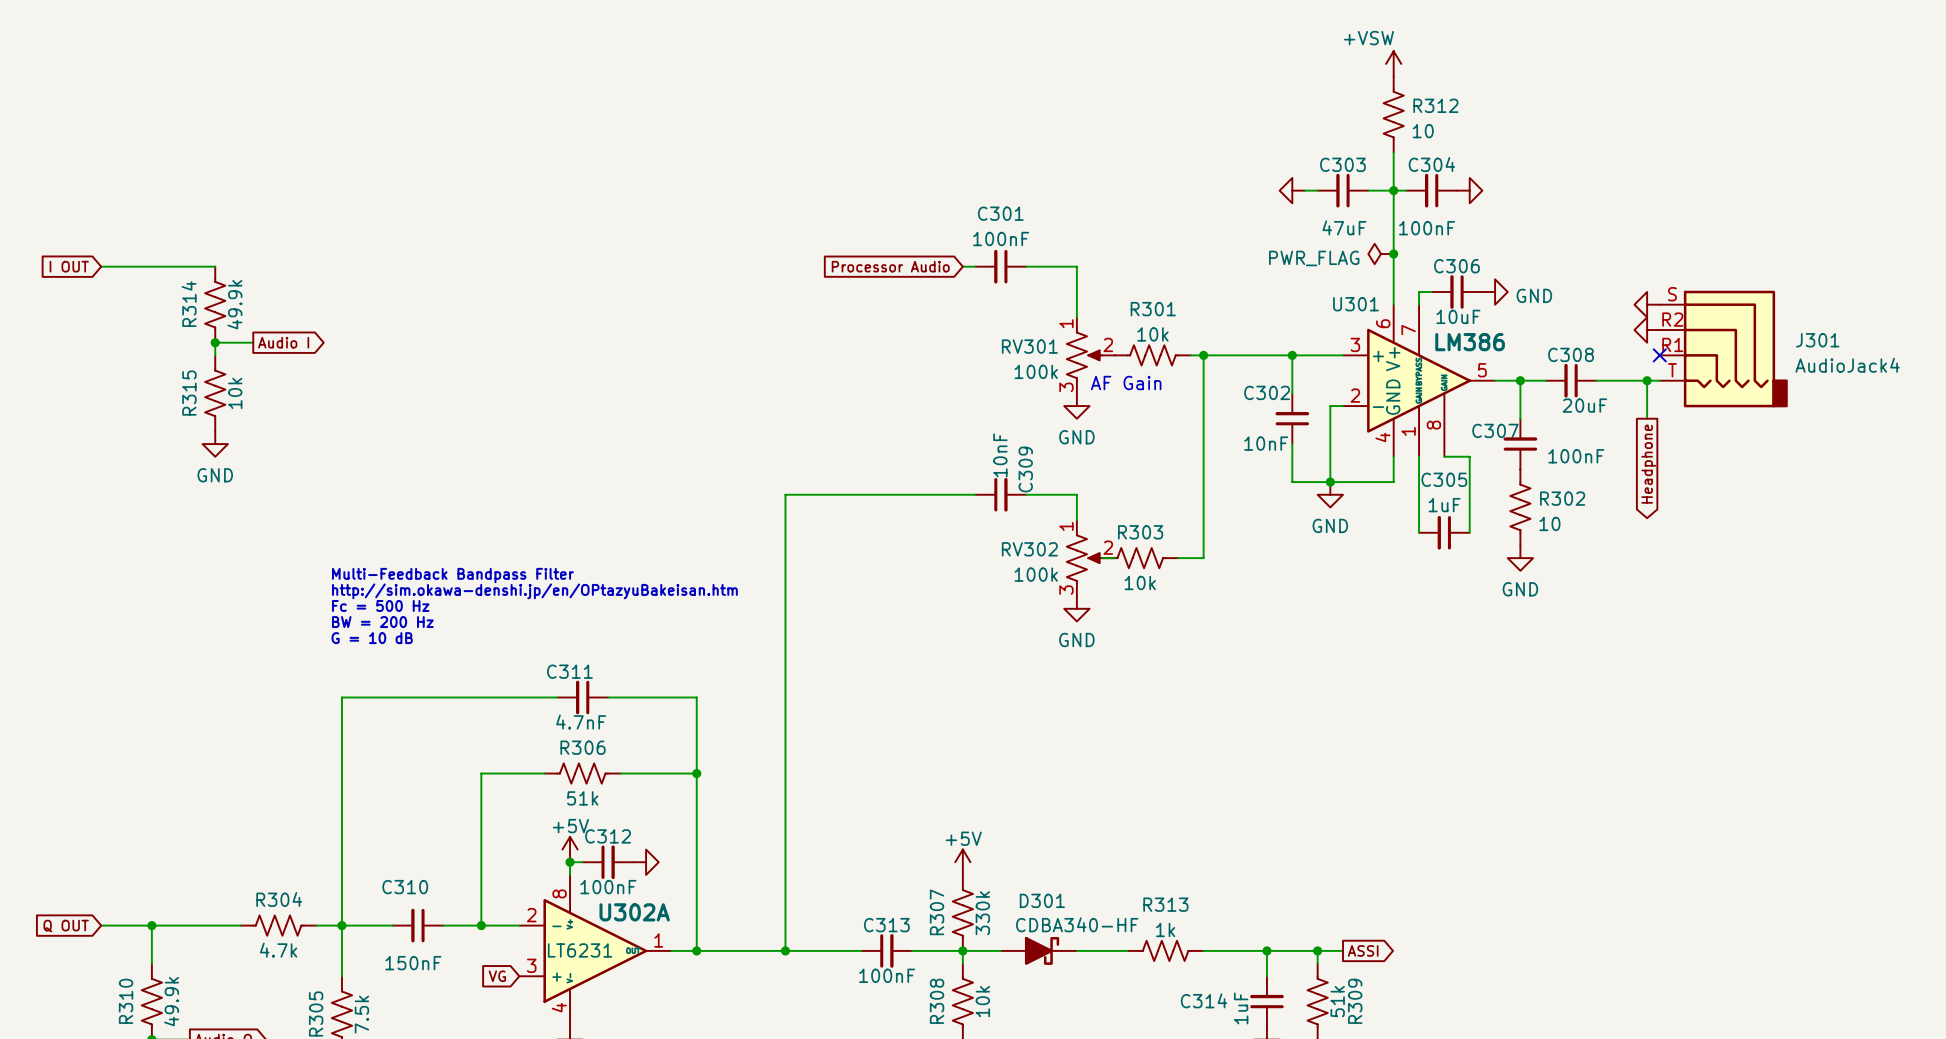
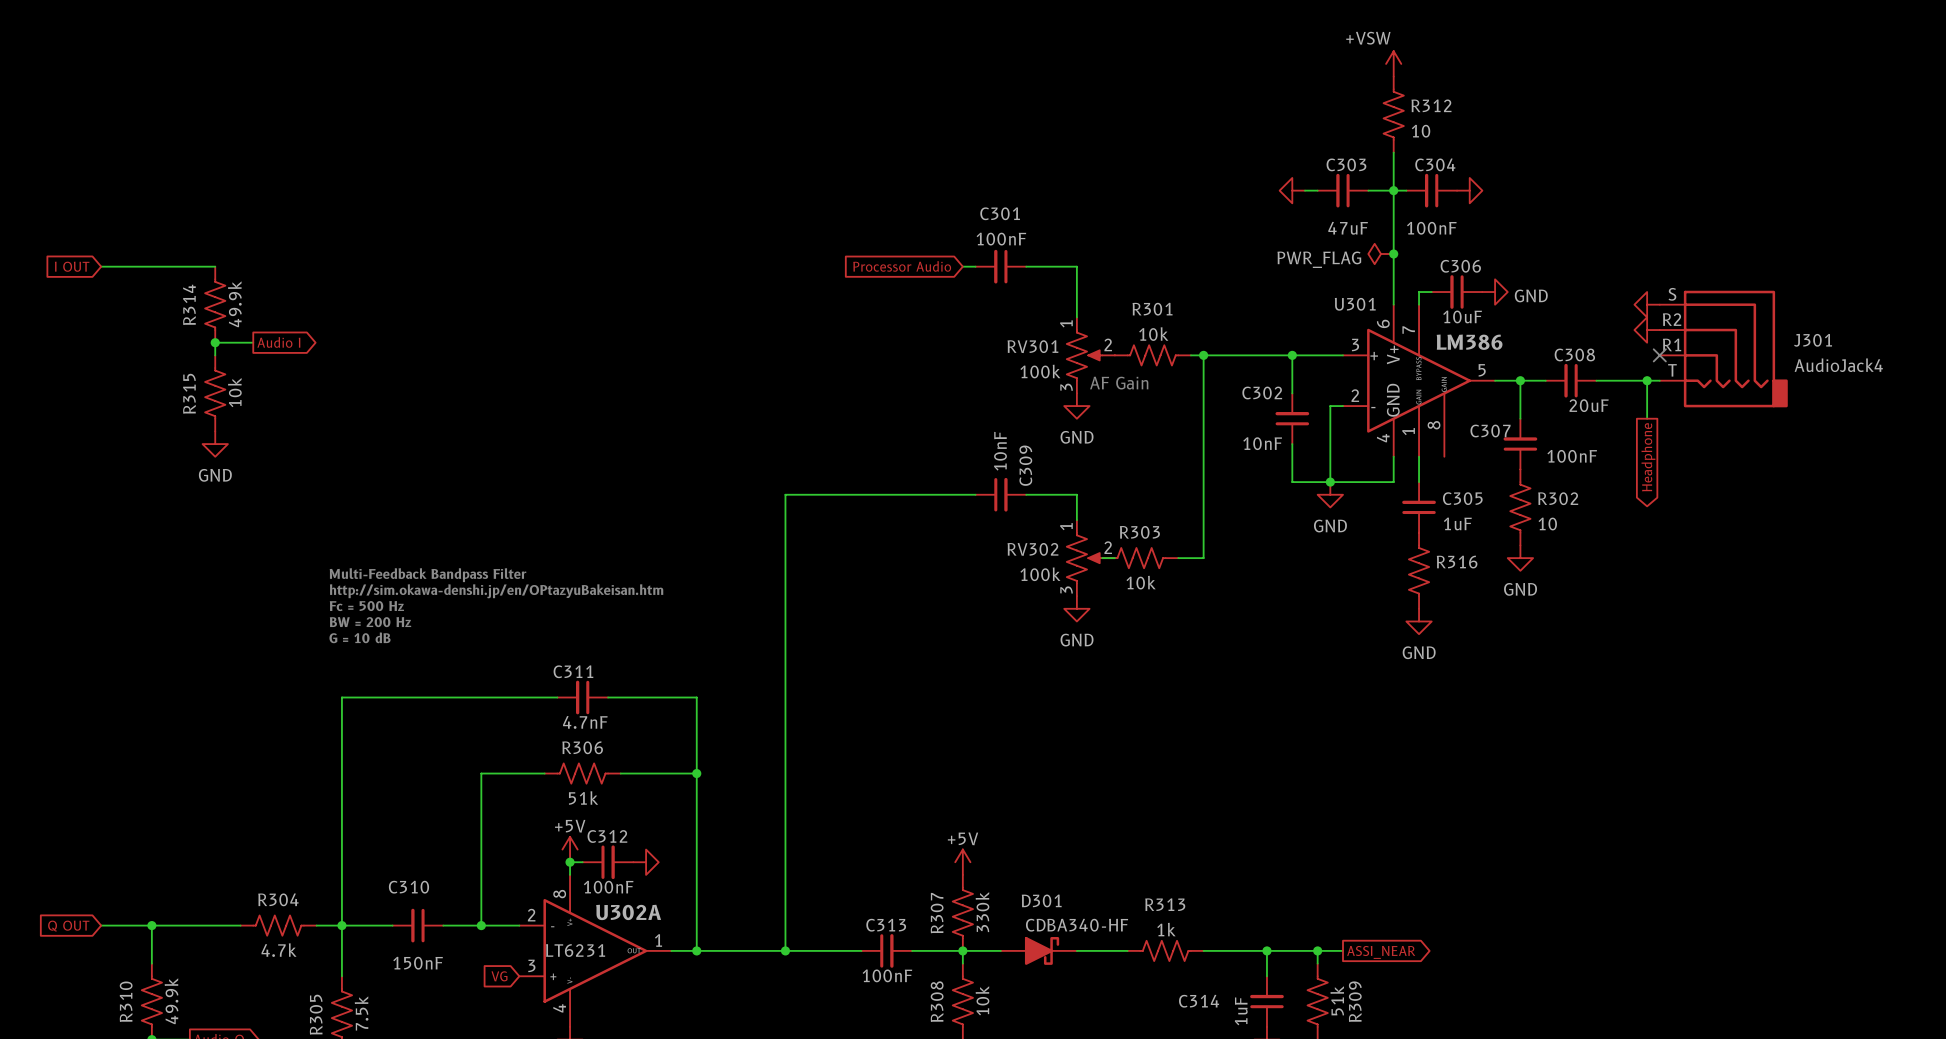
wire: (1444, 456) (1469, 456) (1469, 532) -> none
C305 value position: 1uF (1444, 505) -> 1uF (1457, 523)
C305 rotation: 0° (1444, 532) -> 90° clockwise (1419, 507)
C305 position: (1444, 532) -> (1419, 507)
R316: none -> (1419, 570)
power symbol: none -> GND (1419, 621)
global label: ASSI (1363, 950) -> ASSI_NEAR (1381, 952)

